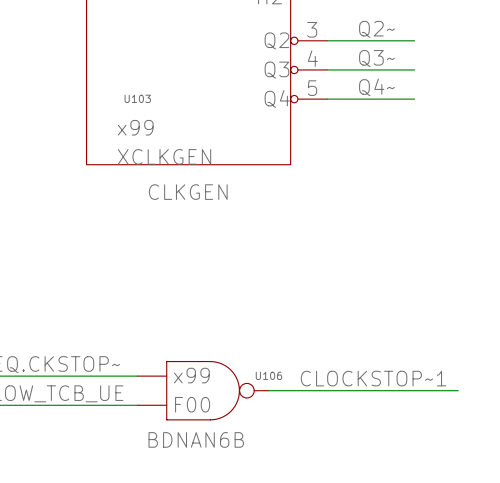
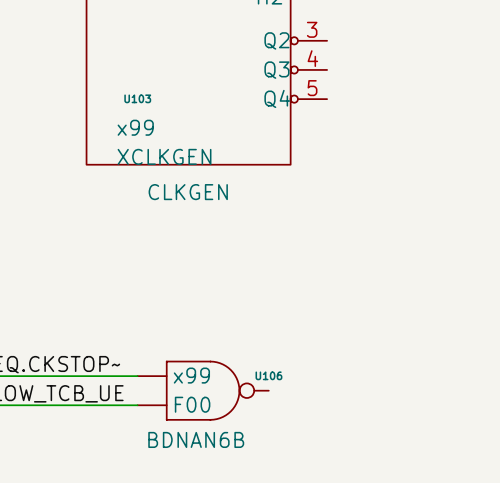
label: Q2~ (376, 29) -> none
wire: (327, 40) (414, 40) -> none
label: Q3~ (376, 58) -> none
wire: (327, 69) (414, 69) -> none
label: Q4~ (376, 87) -> none
wire: (327, 99) (414, 99) -> none
label: CLOCKSTOP~1 (373, 378) -> none
wire: (268, 390) (458, 390) -> none

